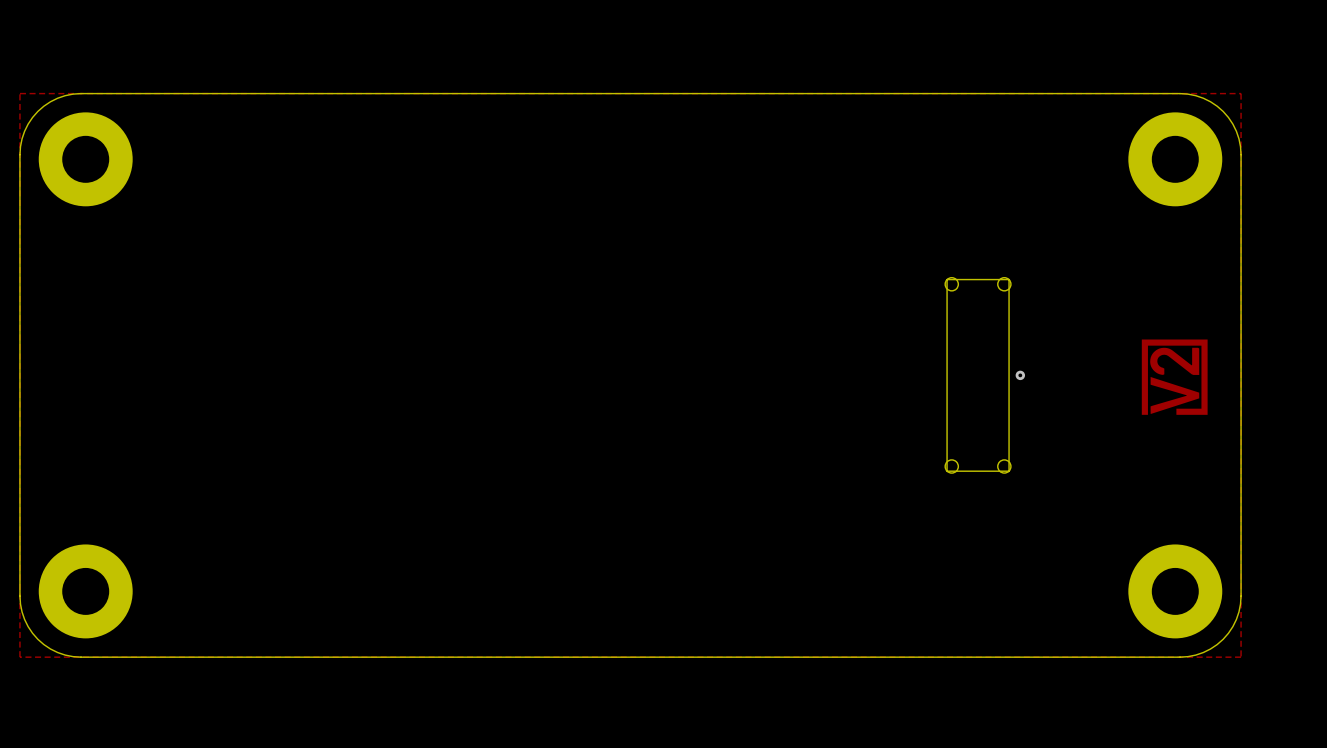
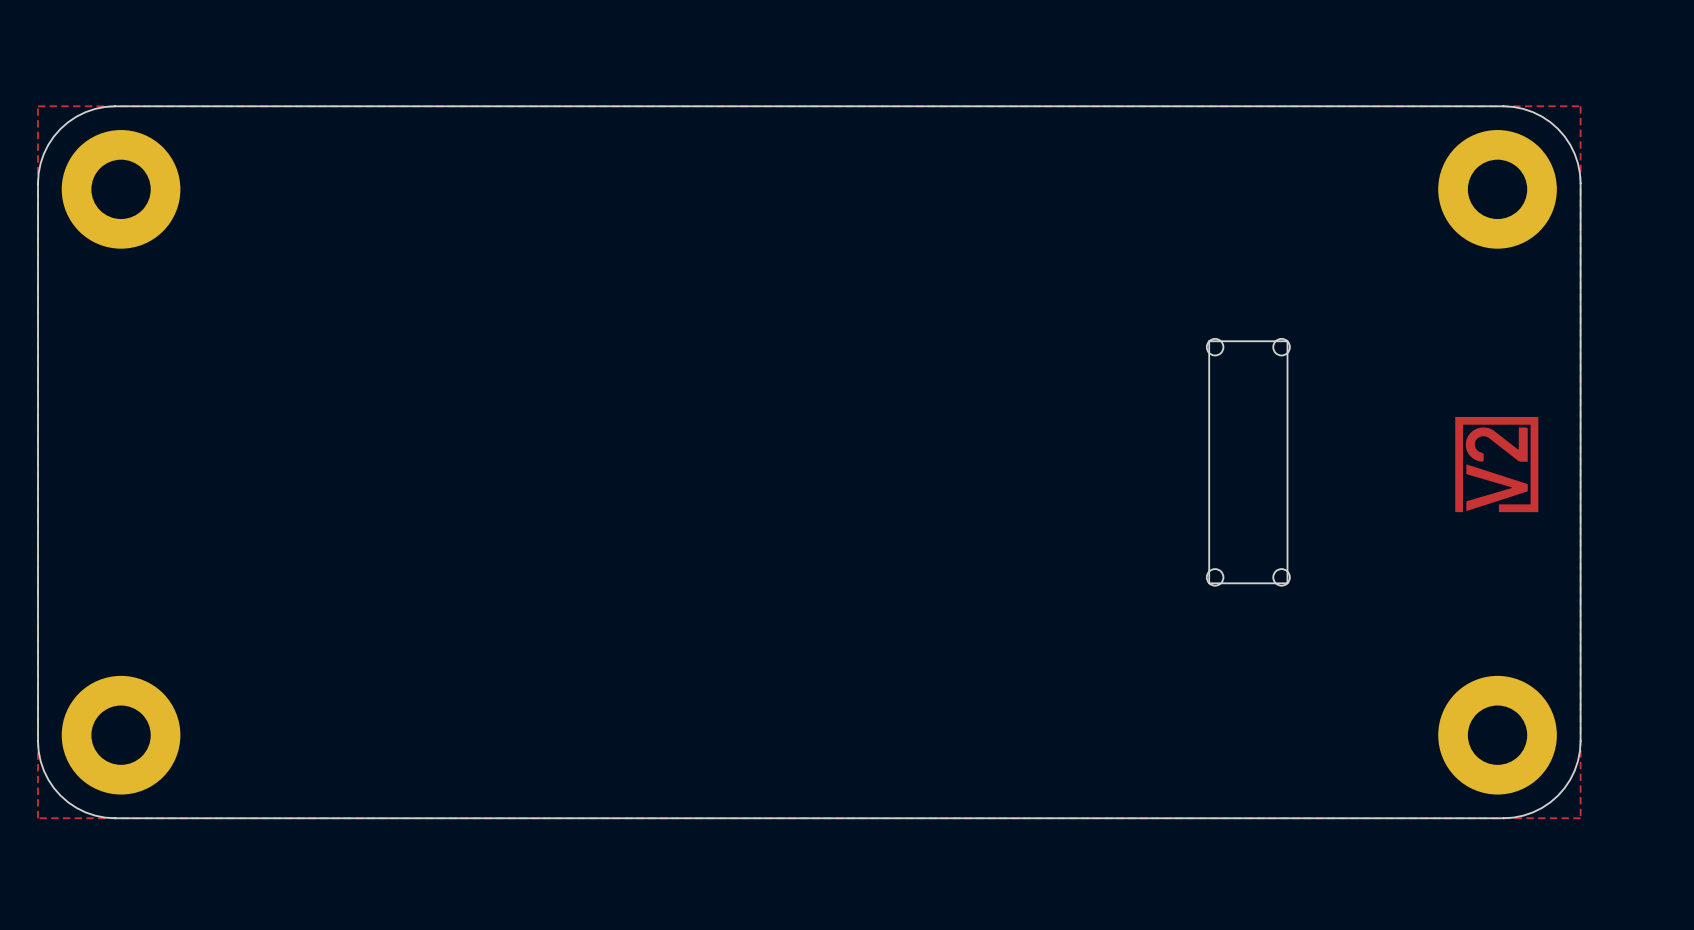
via: (1020, 375) -> none

